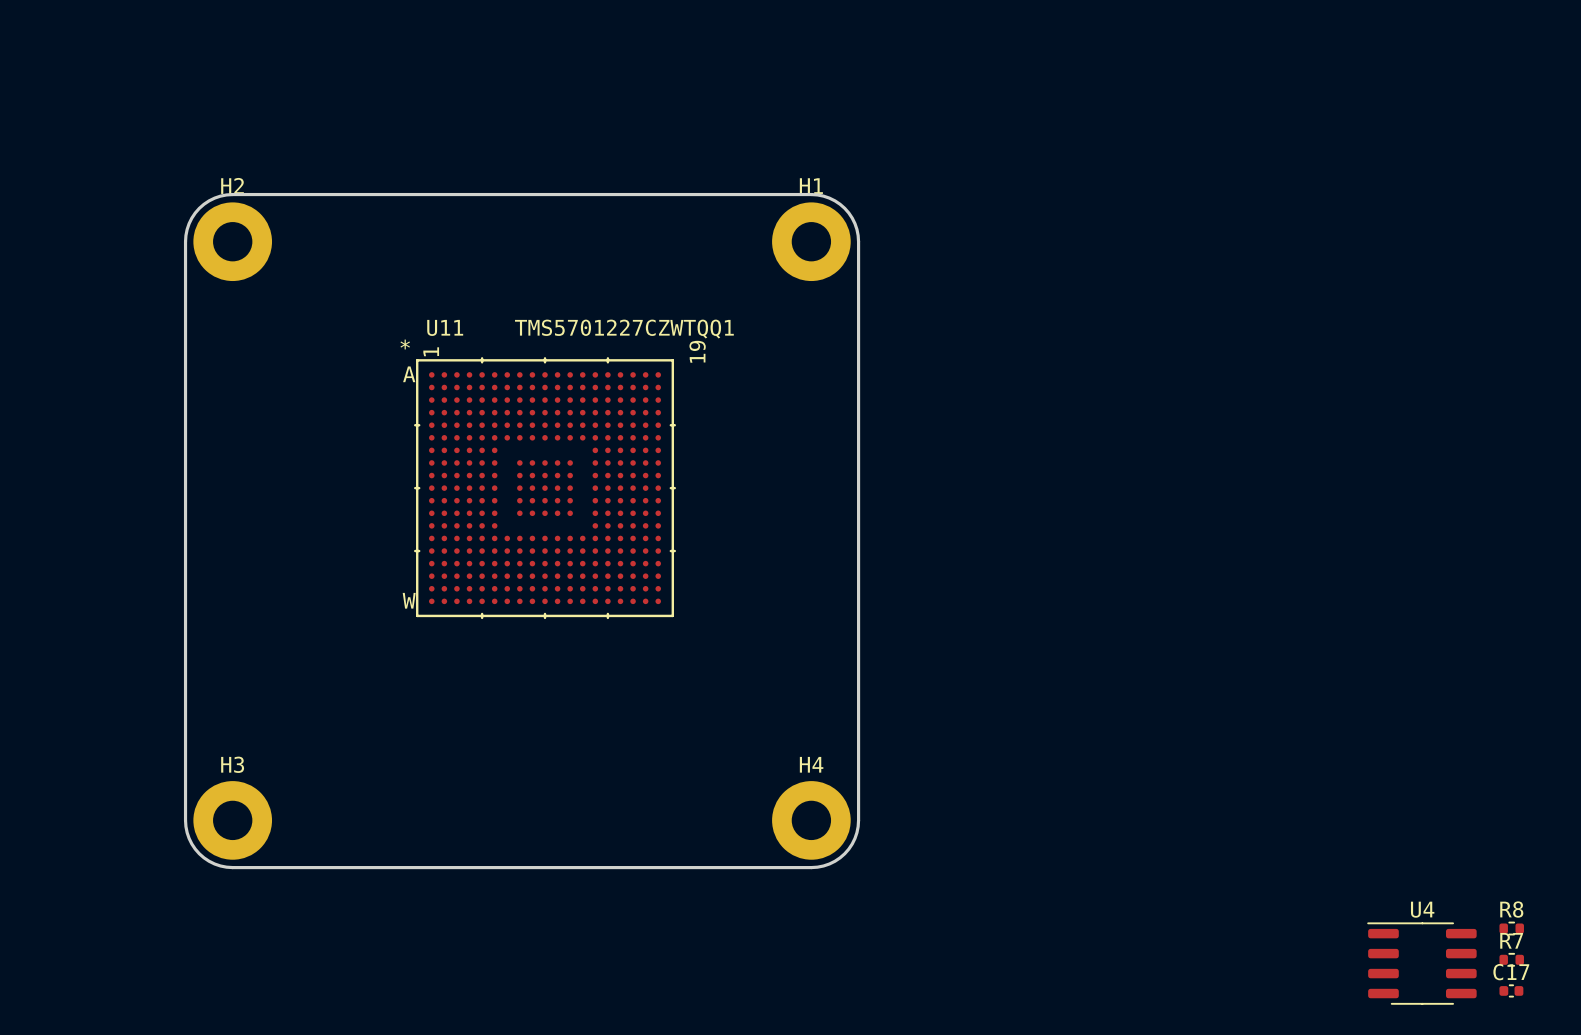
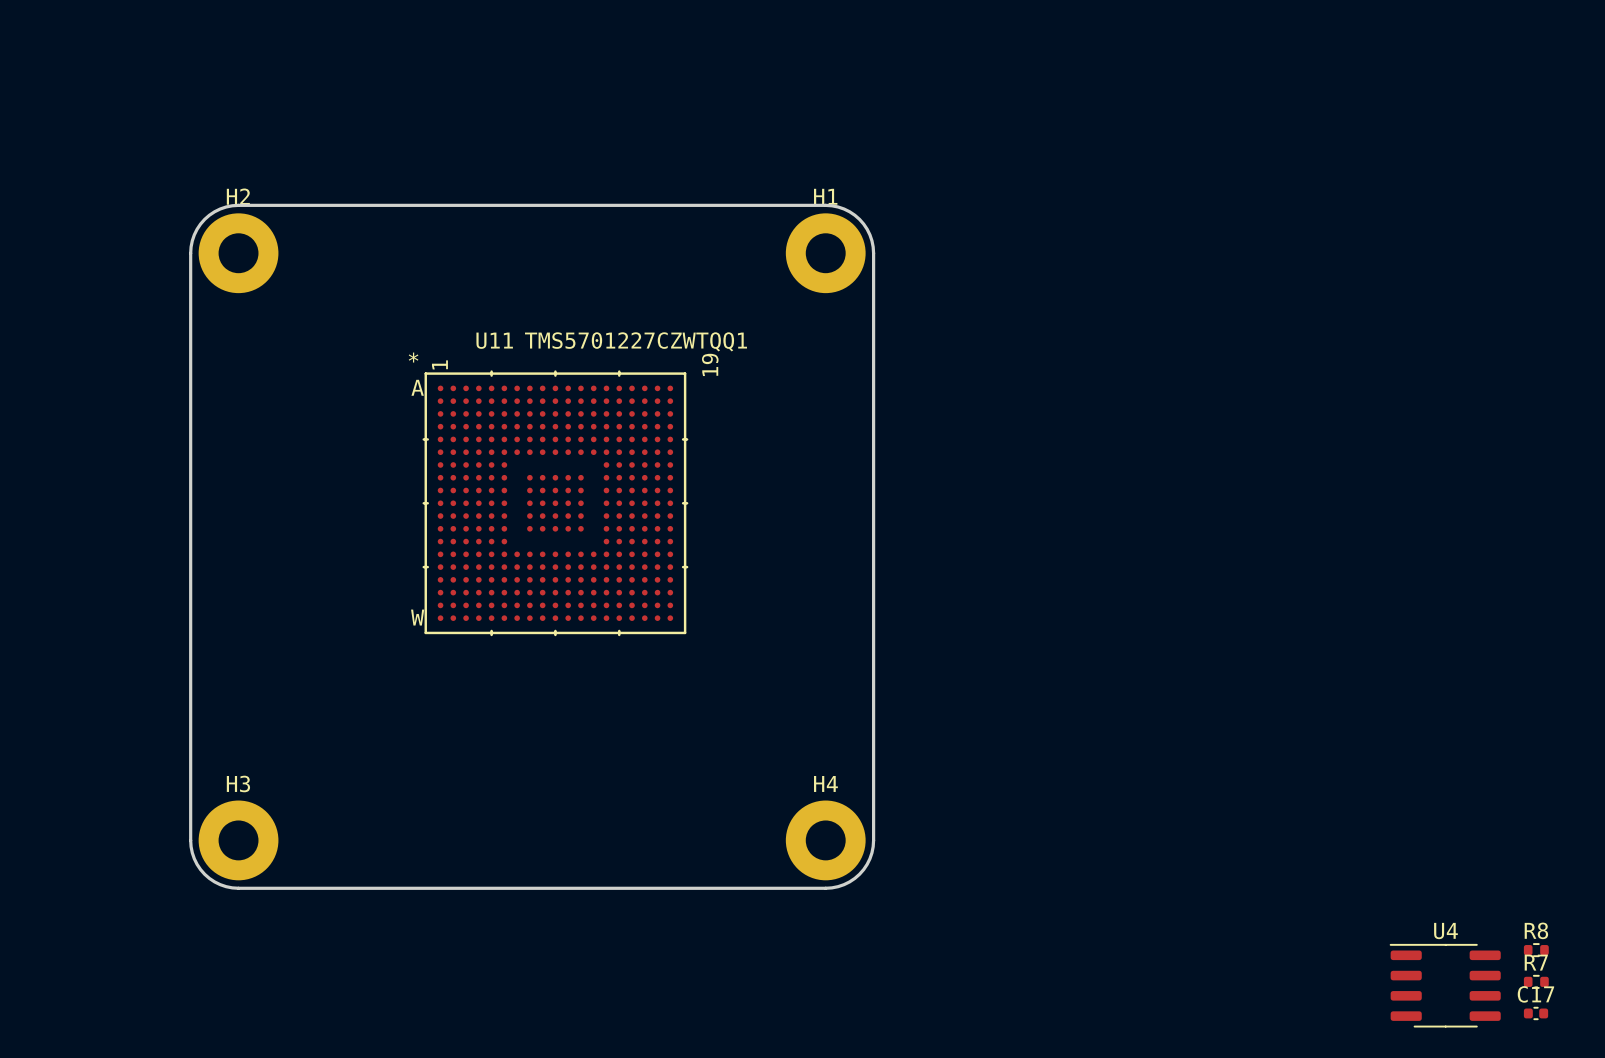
U11 name position: U11 (445, 327) -> U11 (494, 340)

